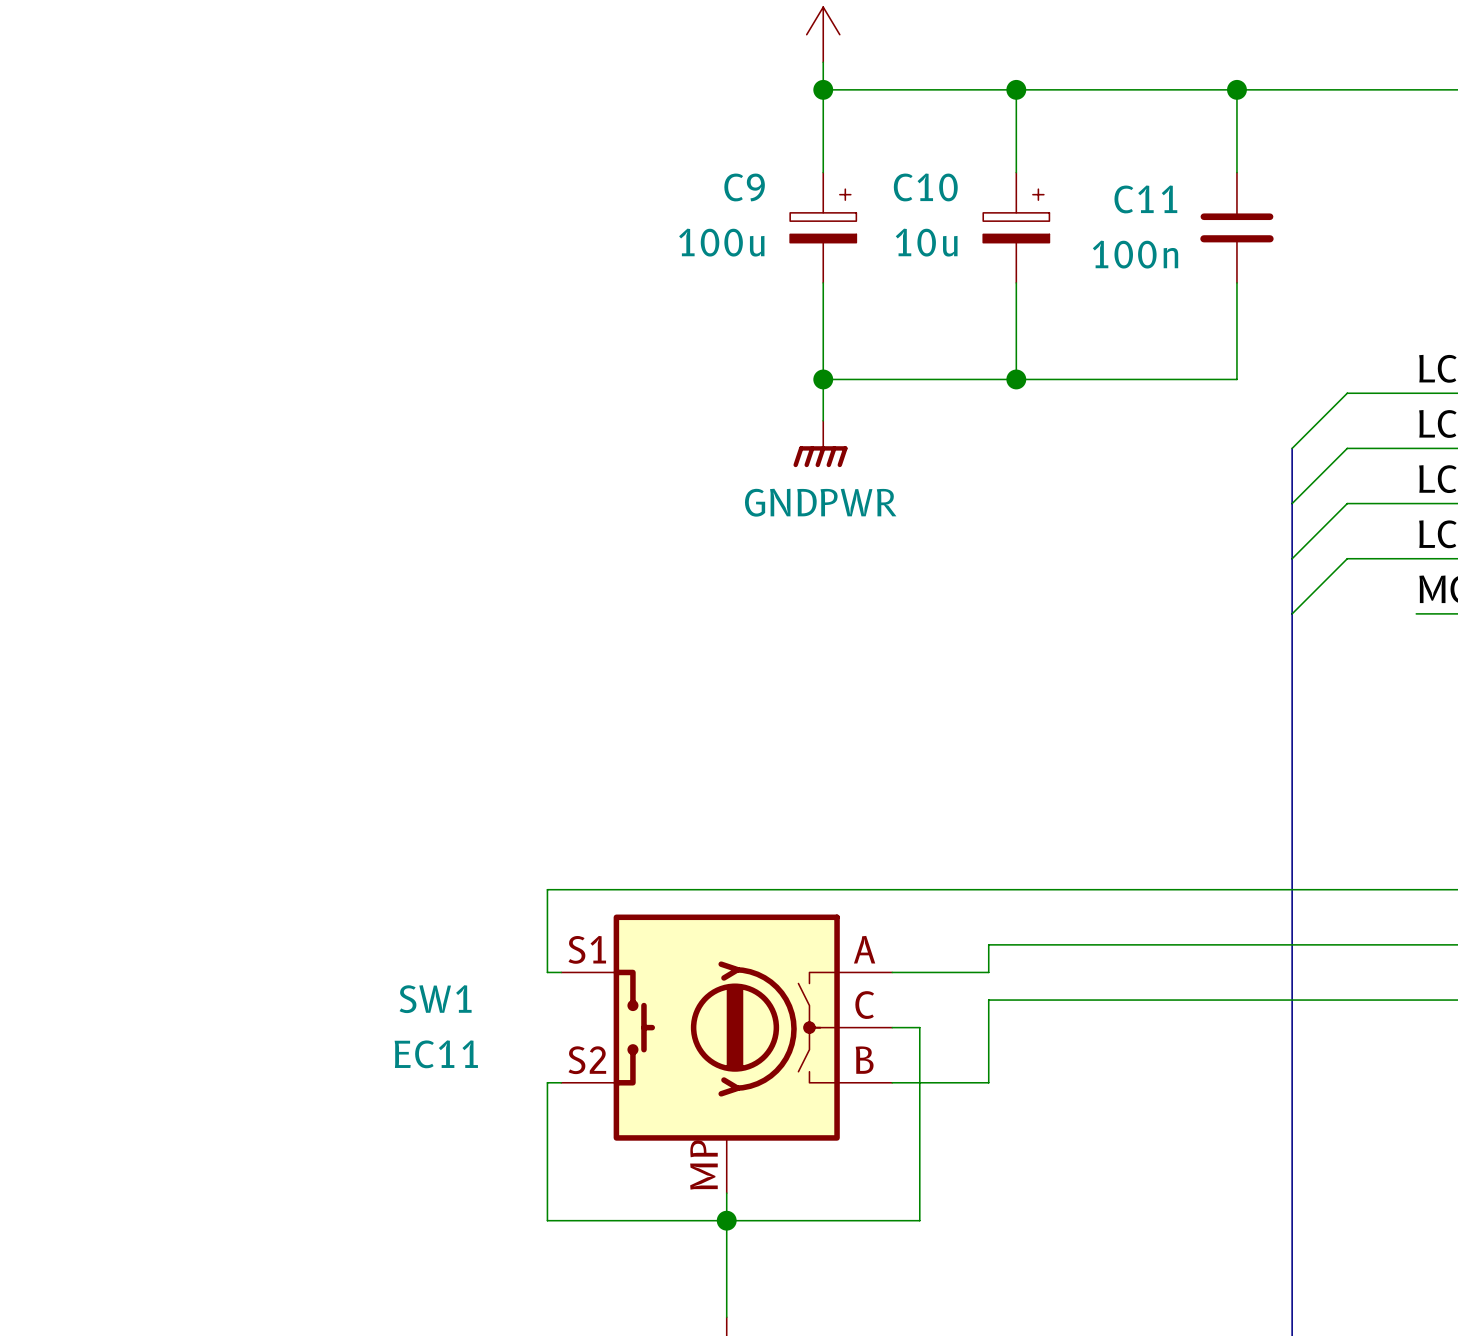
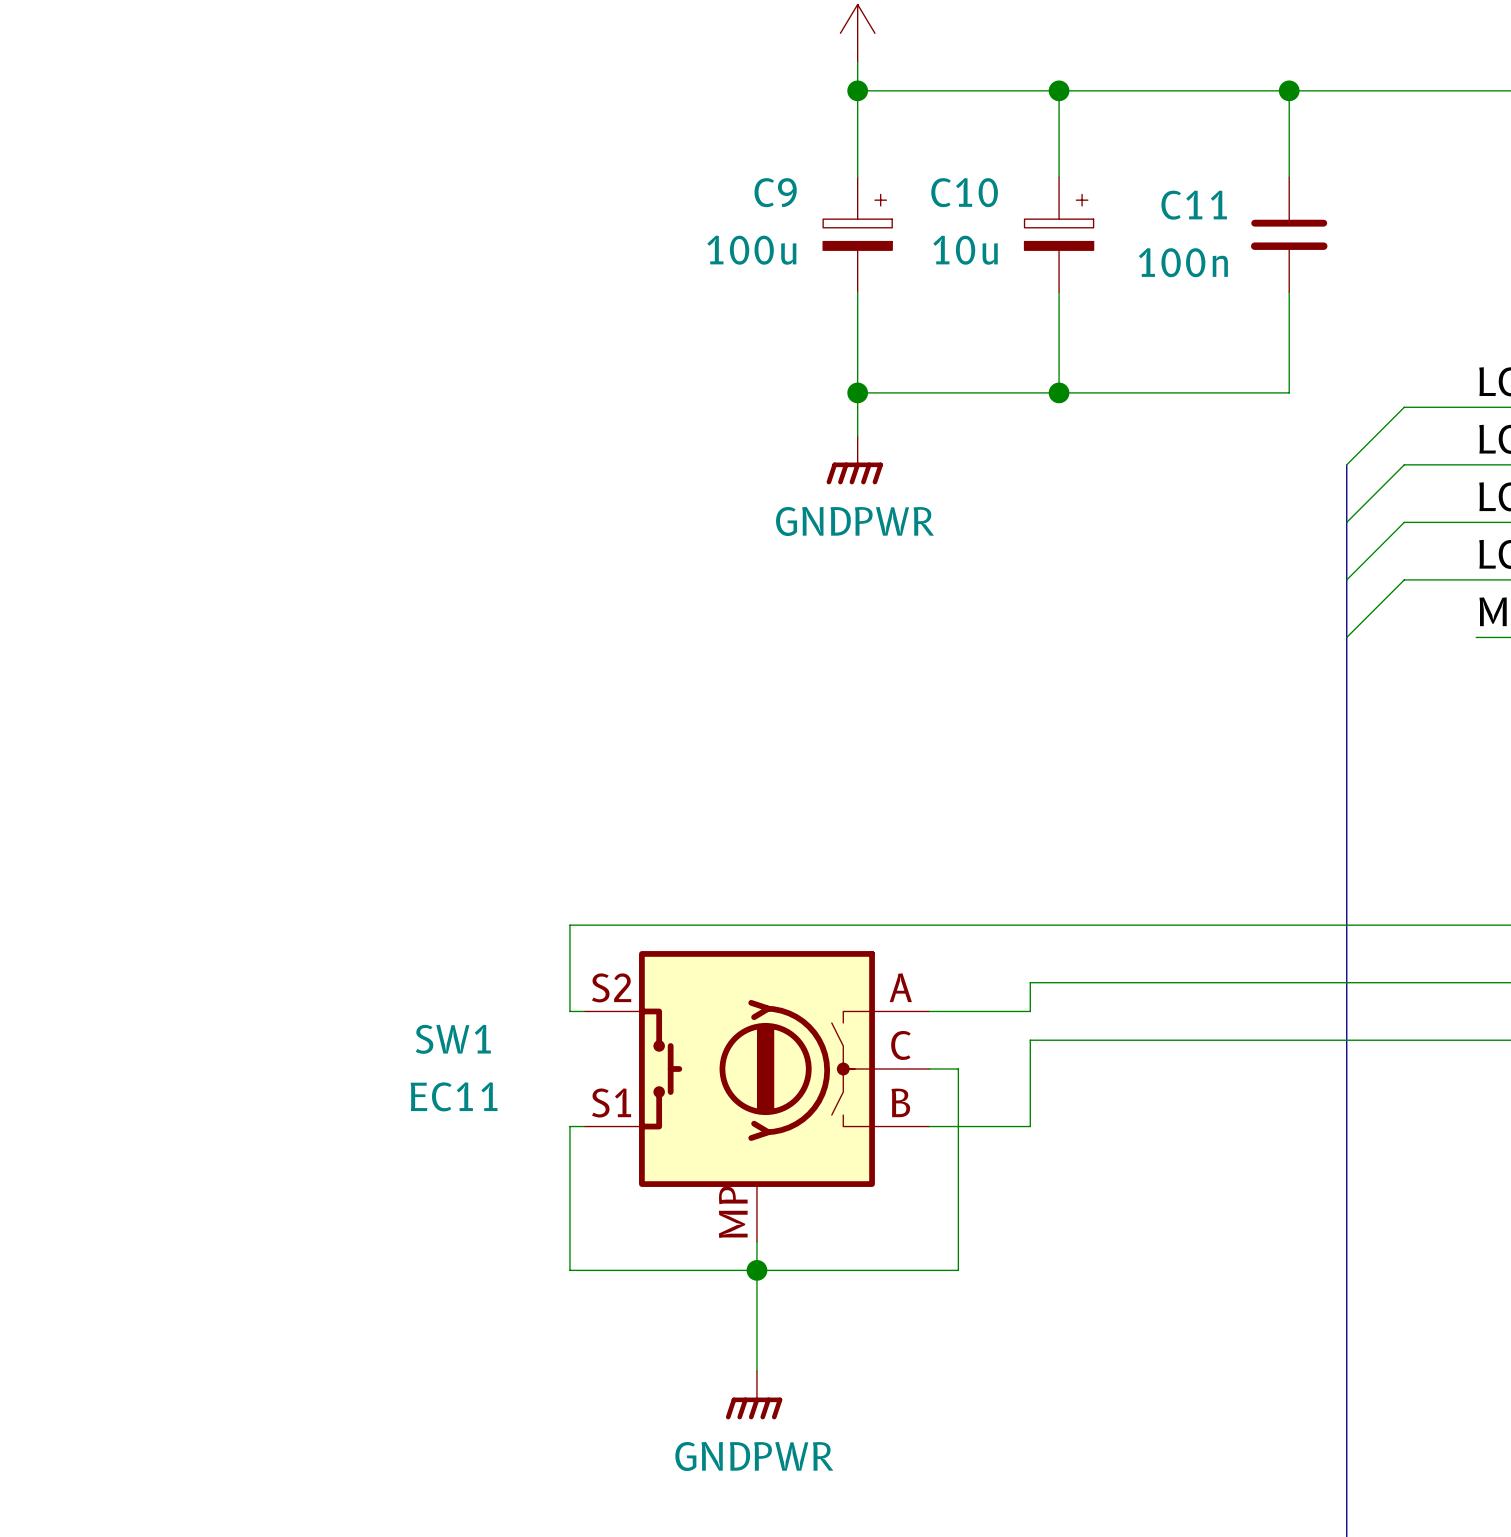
SW1 pin number: S1 (587, 949) -> S2 (611, 987)
SW1 pin number: S2 (587, 1060) -> S1 (611, 1102)

